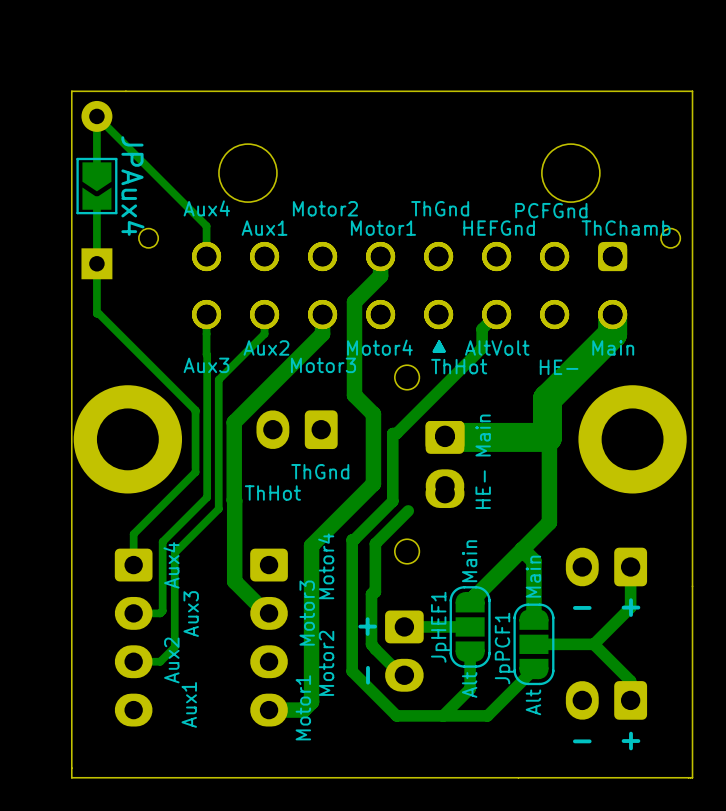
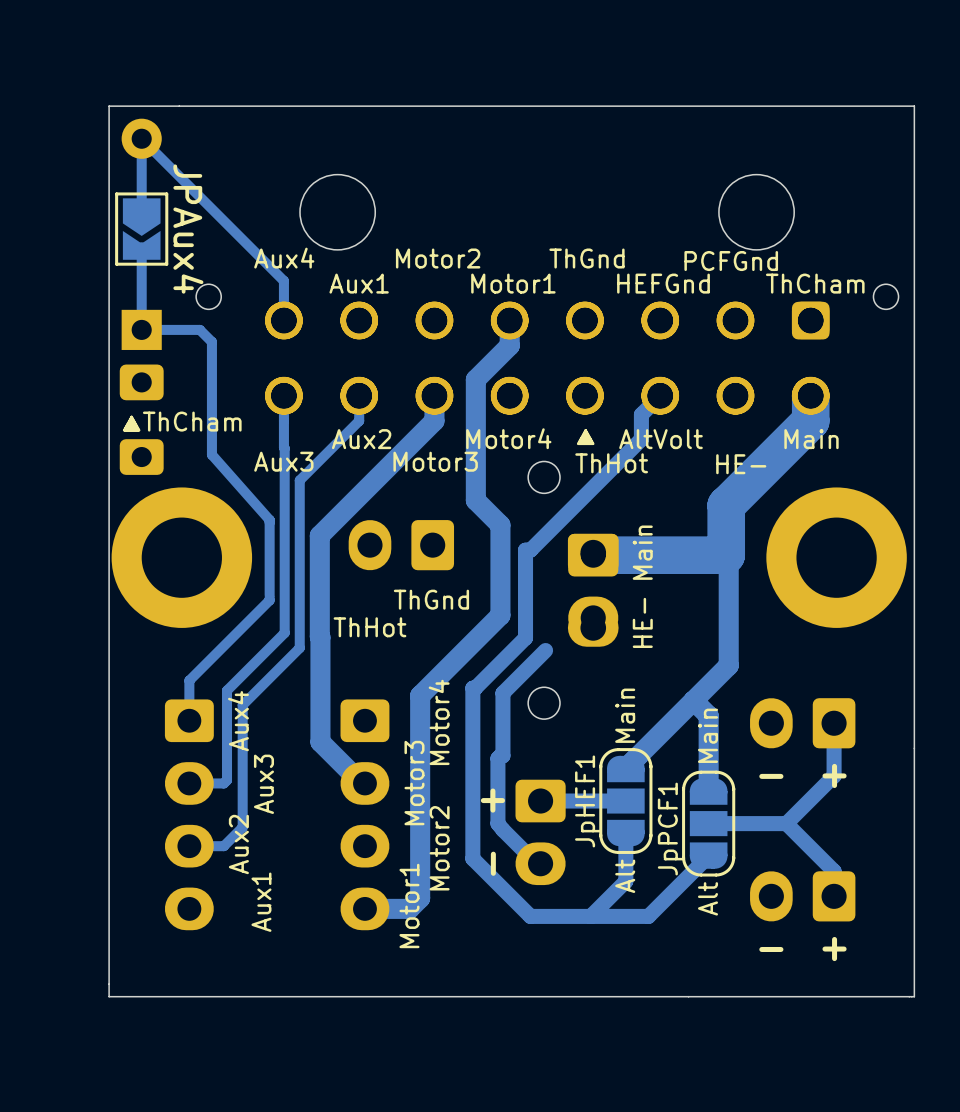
text: ThChamb (626, 228) -> ThCham (815, 283)
track: (96, 263) (96, 313) (195, 410) -> (141, 329) (199, 329) (211, 341) (211, 454) (269, 520)
part: none -> (141, 419)
text: none -> ▲ThCham (182, 421)

